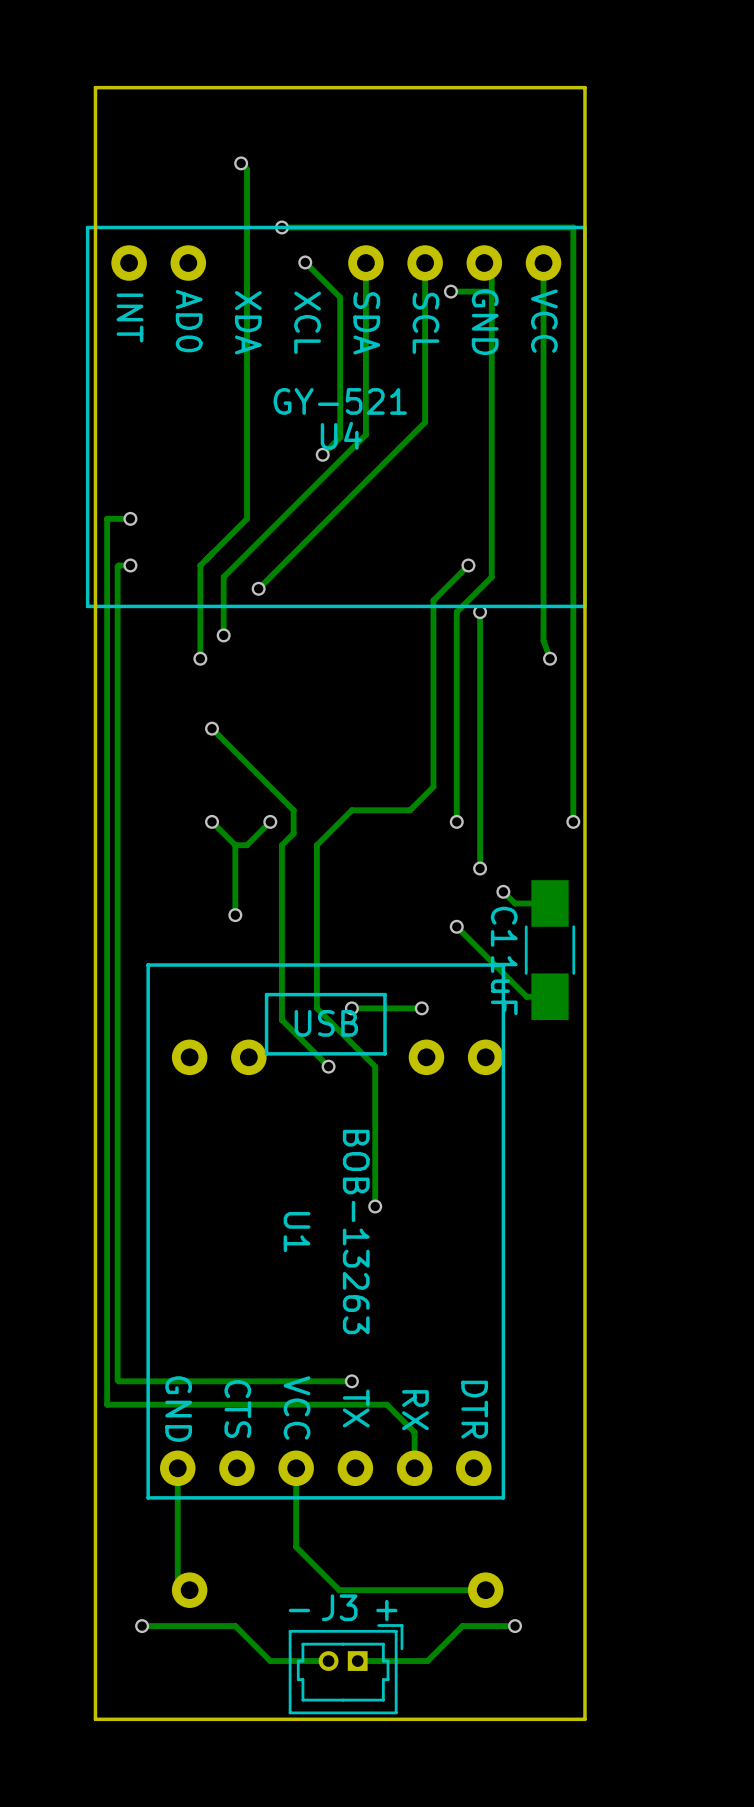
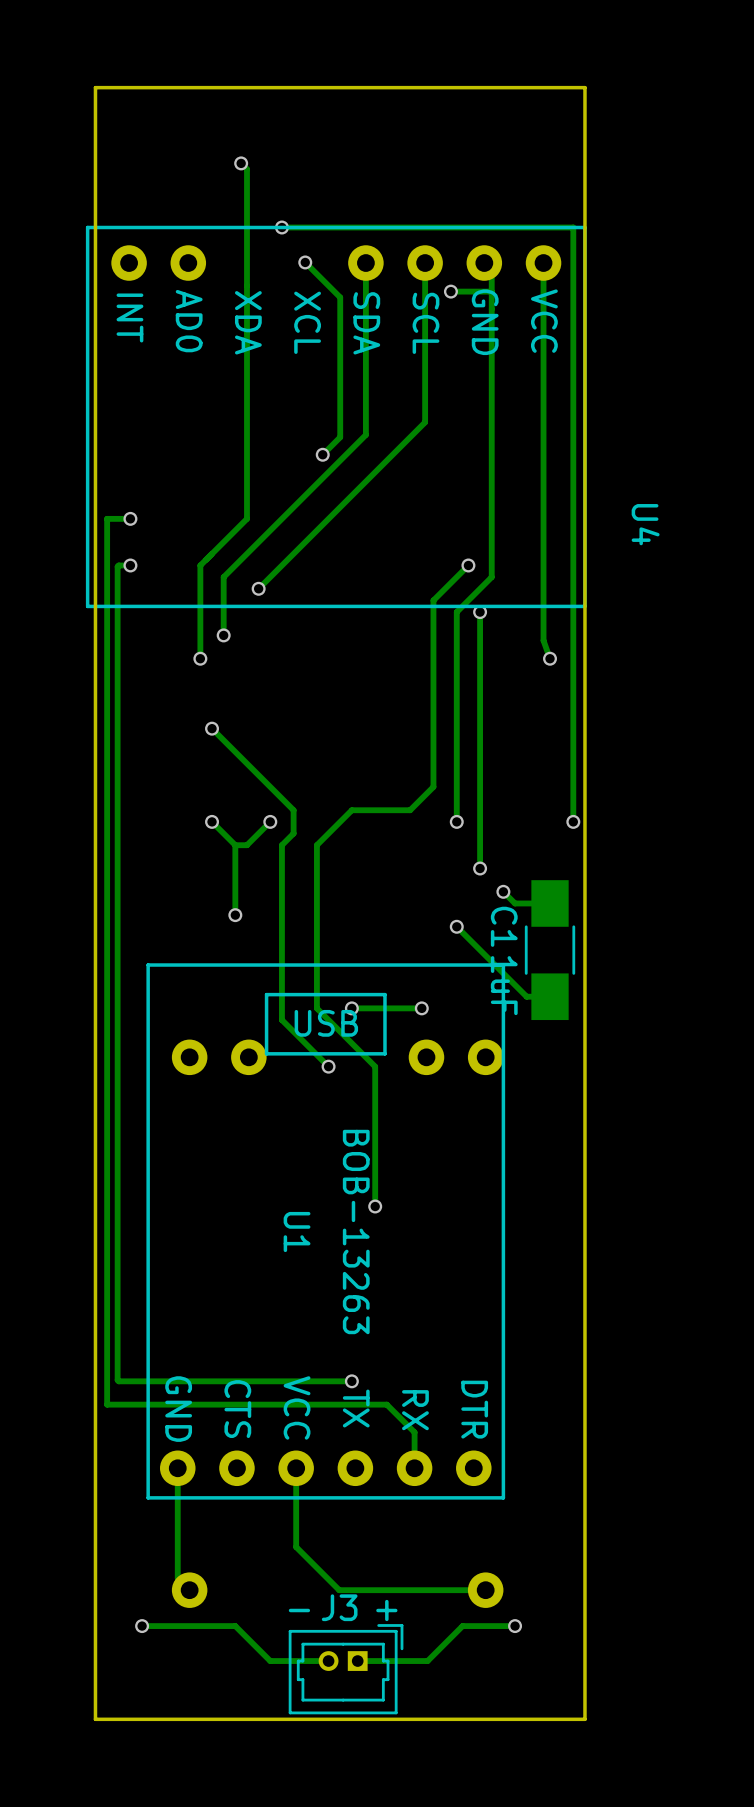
U4 value: GY-521 (340, 401) -> none
U4 name rotation: 0° (341, 435) -> 90° clockwise (645, 524)
U4 name position: U4 (341, 435) -> U4 (645, 524)

